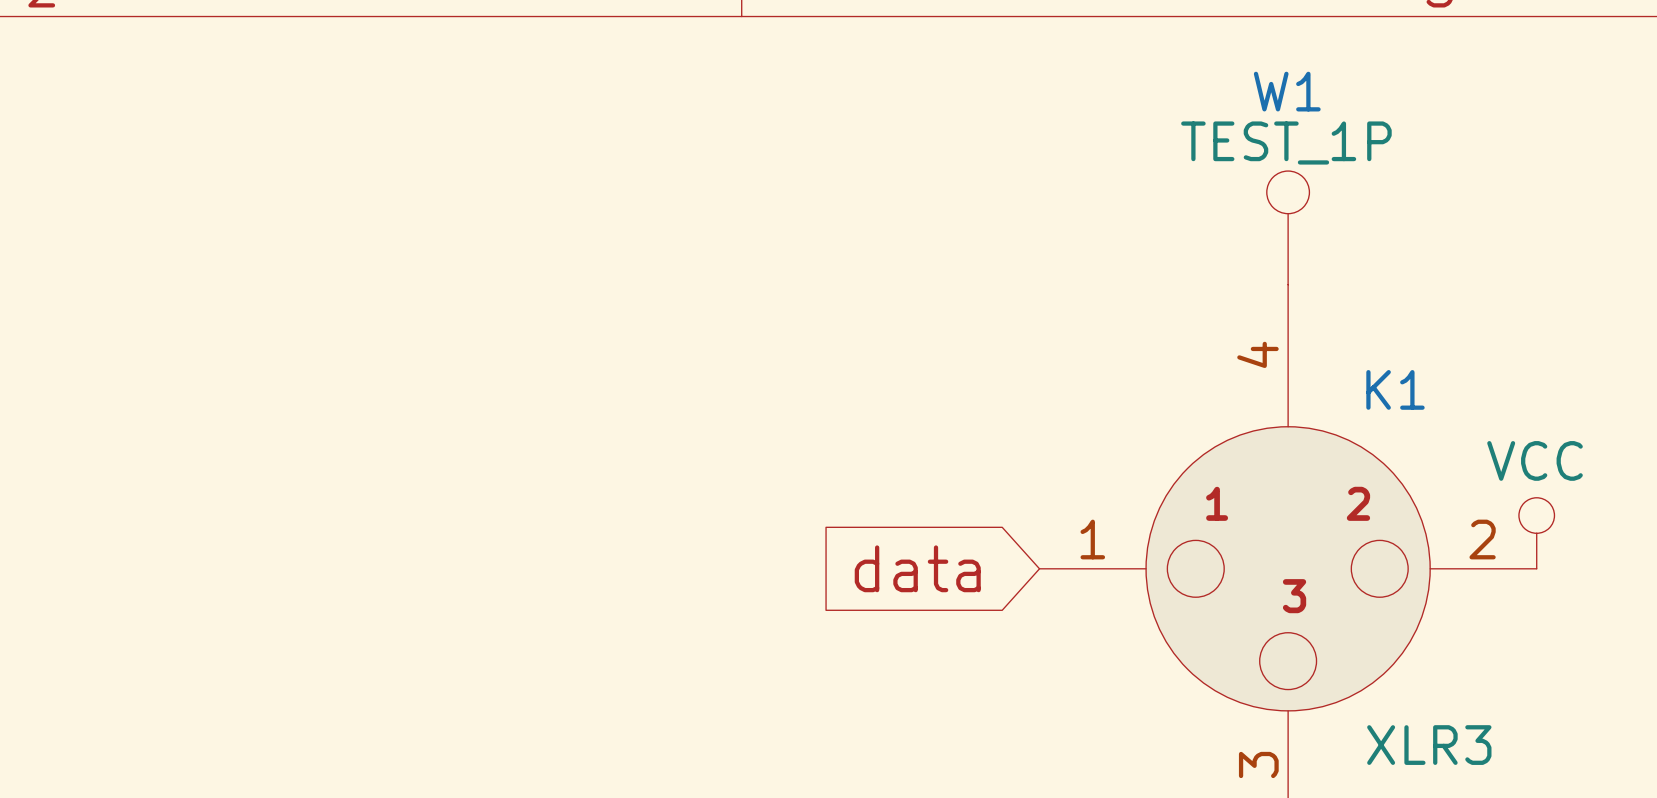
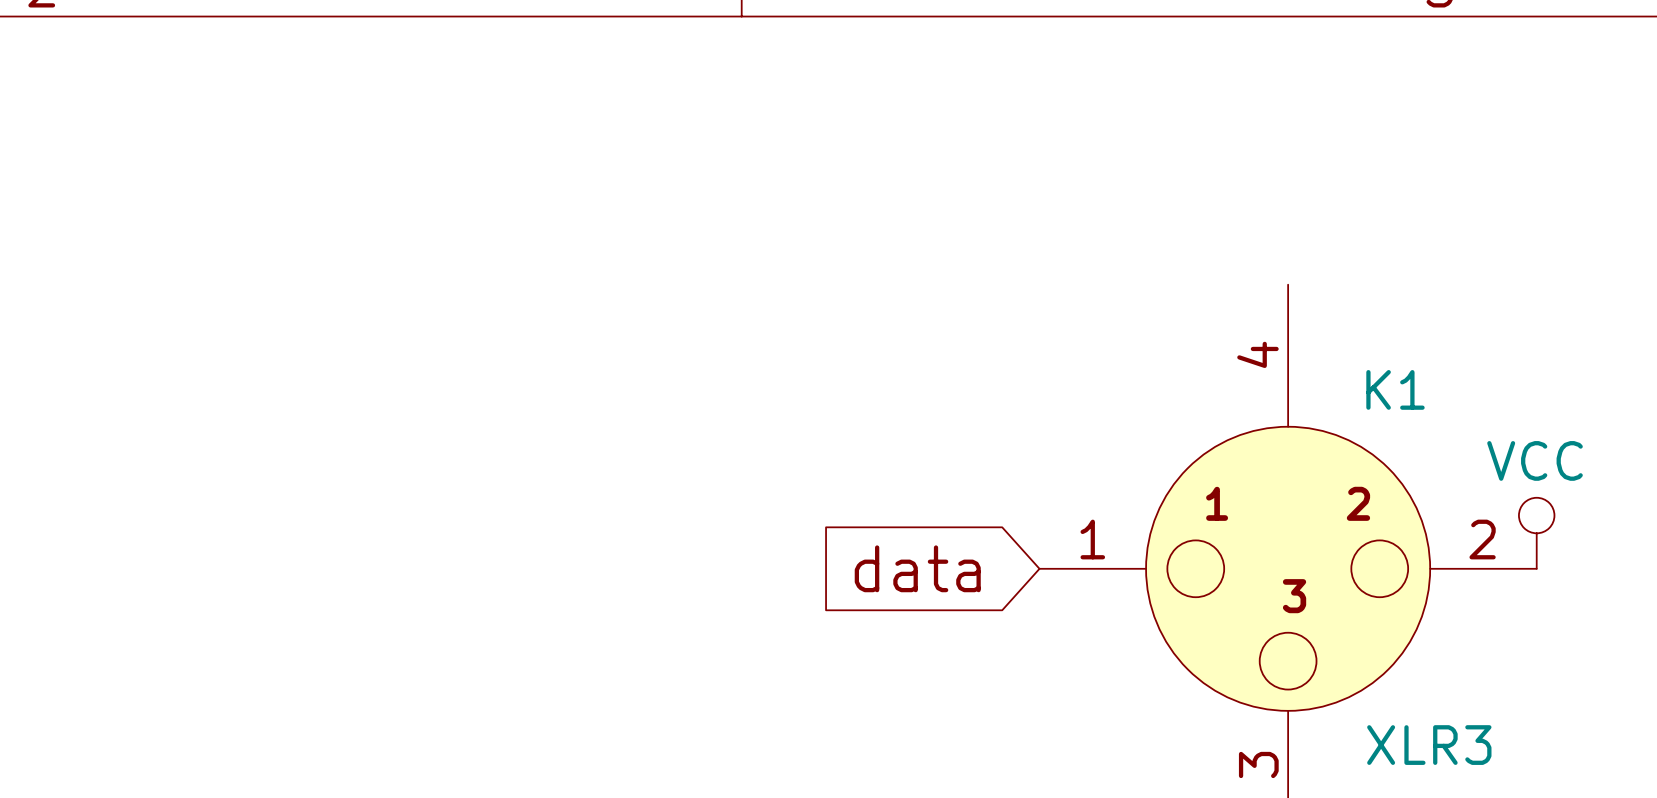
W1: TEST_1P (1288, 227) -> none

